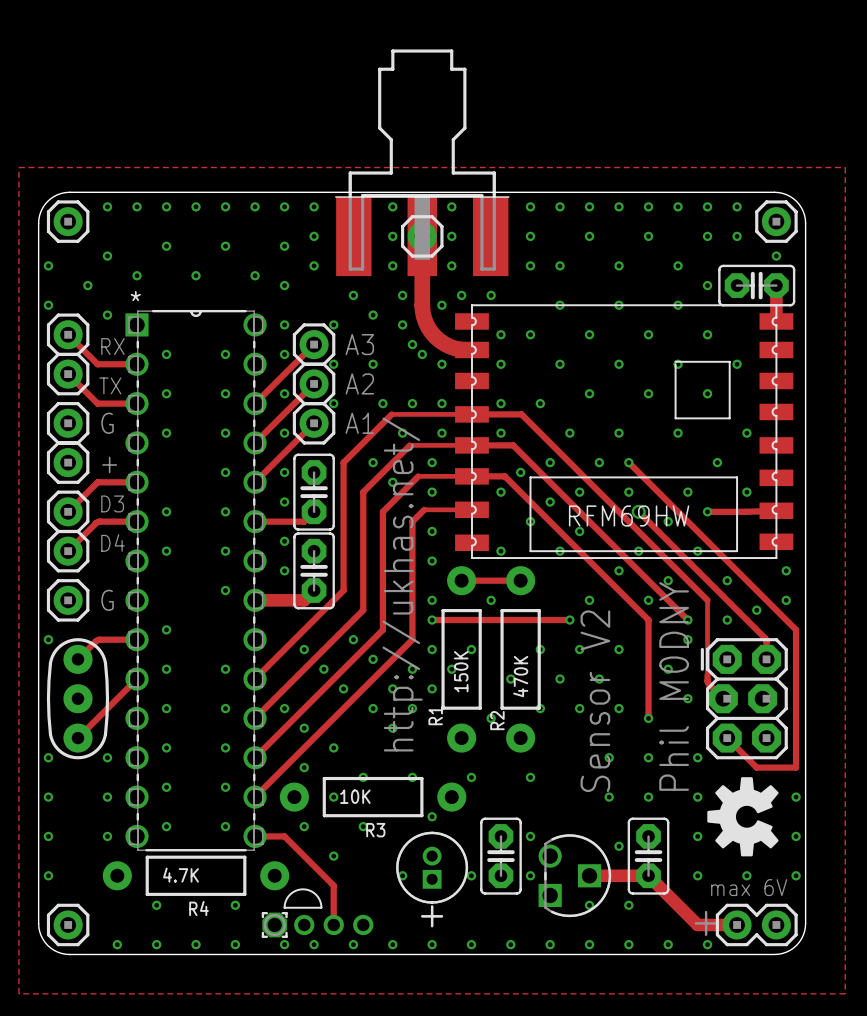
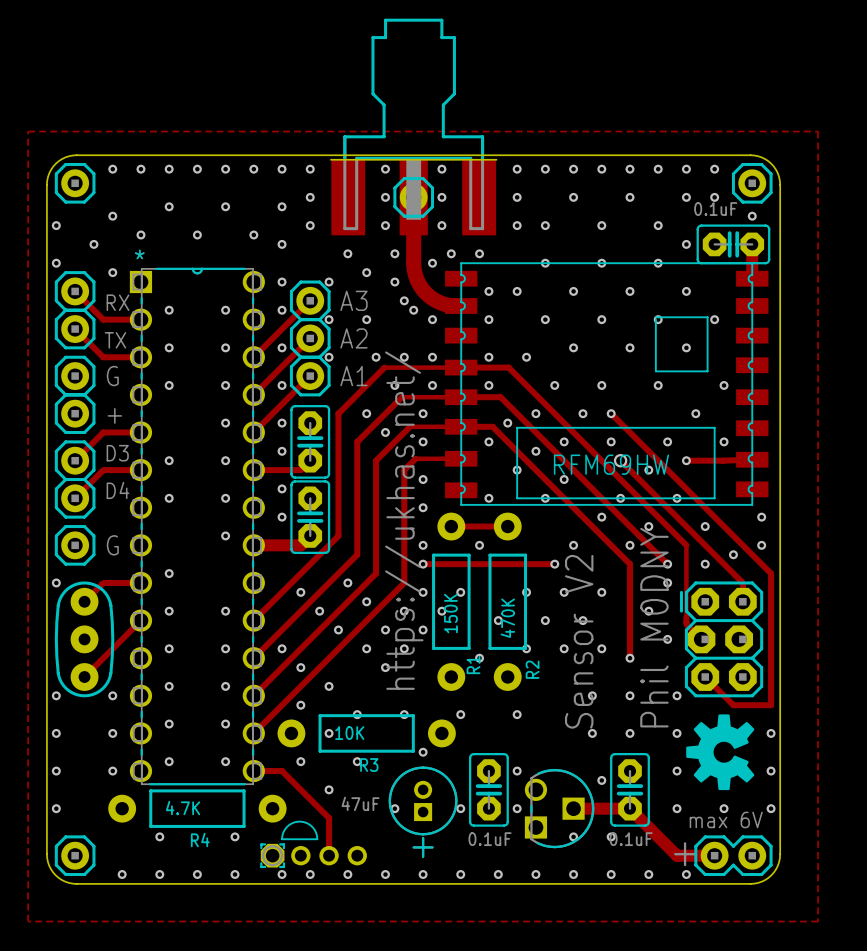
part value: none -> 0.1uF (715, 209)
text: http://ukhas.net/ (402, 584) -> https://ukhas.net/ (404, 520)
R1 name position: R1 (435, 715) -> R1 (473, 664)
R2 name position: R2 (497, 720) -> R2 (532, 669)
part value: none -> 47uF (360, 803)
part value: none -> 0.1uF (490, 839)
part value: none -> 0.1uF (631, 839)

